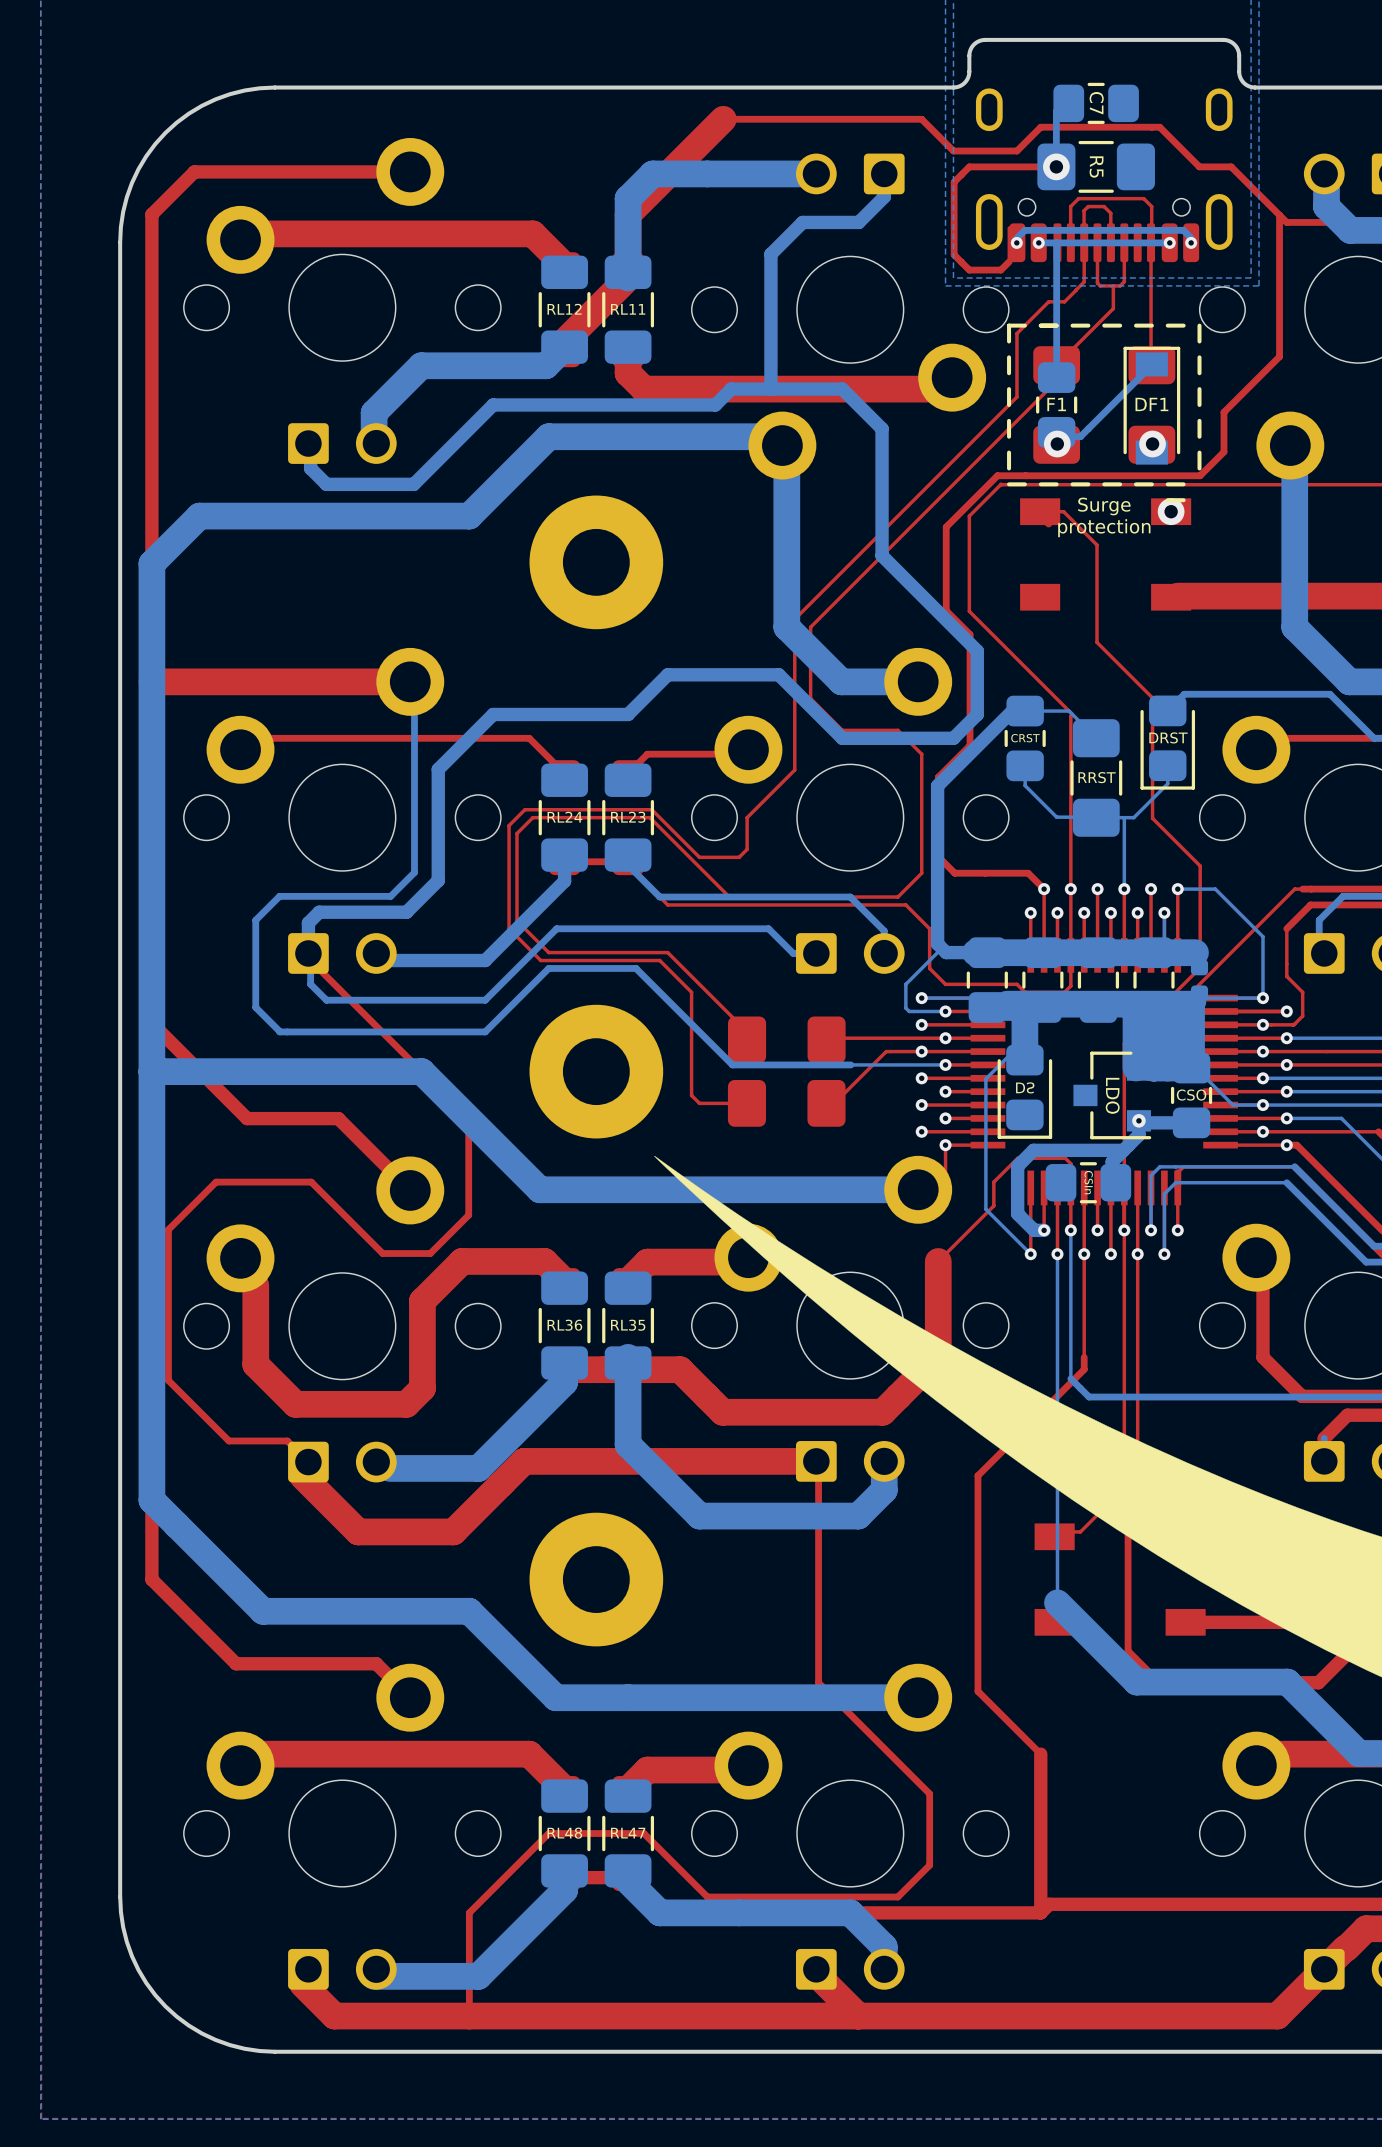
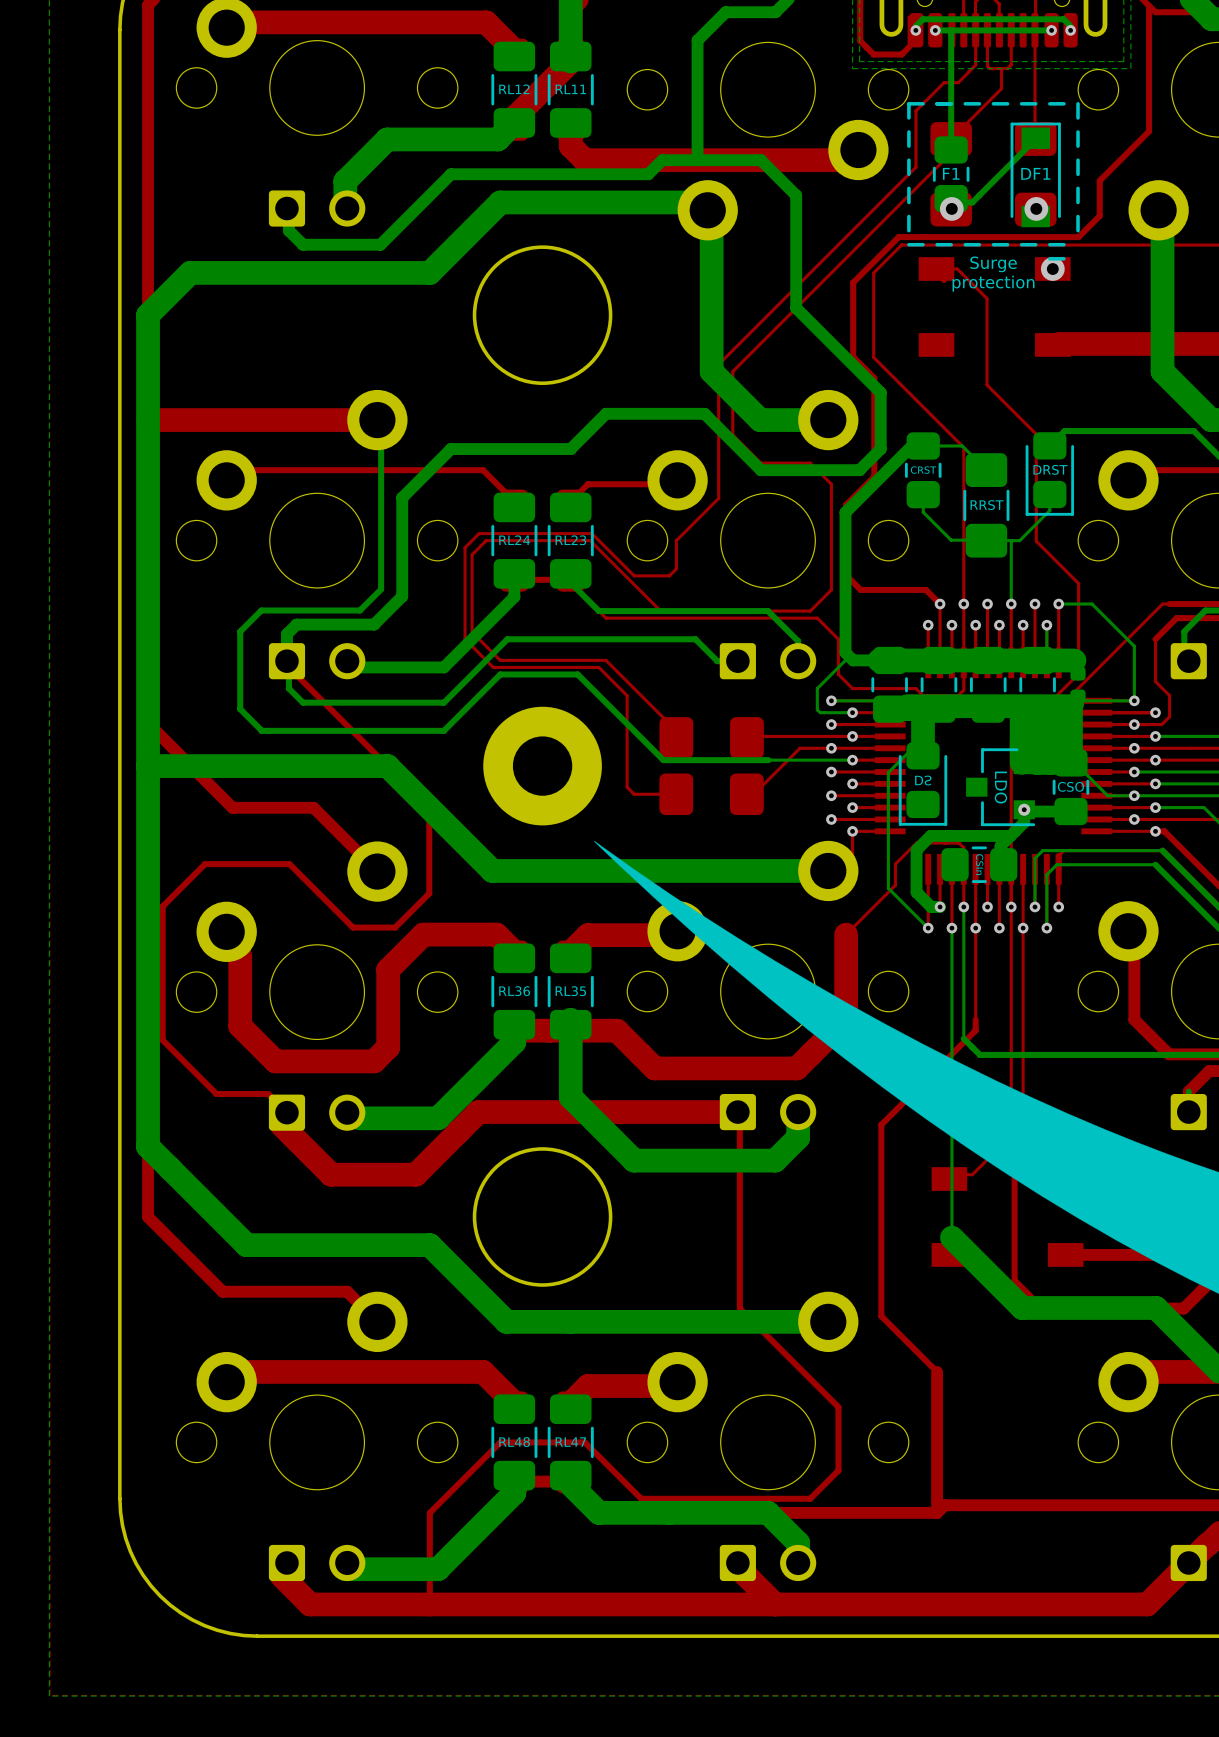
round board edge: none -> [472, 245, 613, 386]
part: (596, 562) -> none
round board edge: none -> [472, 1147, 613, 1287]
part: (596, 1579) -> none

